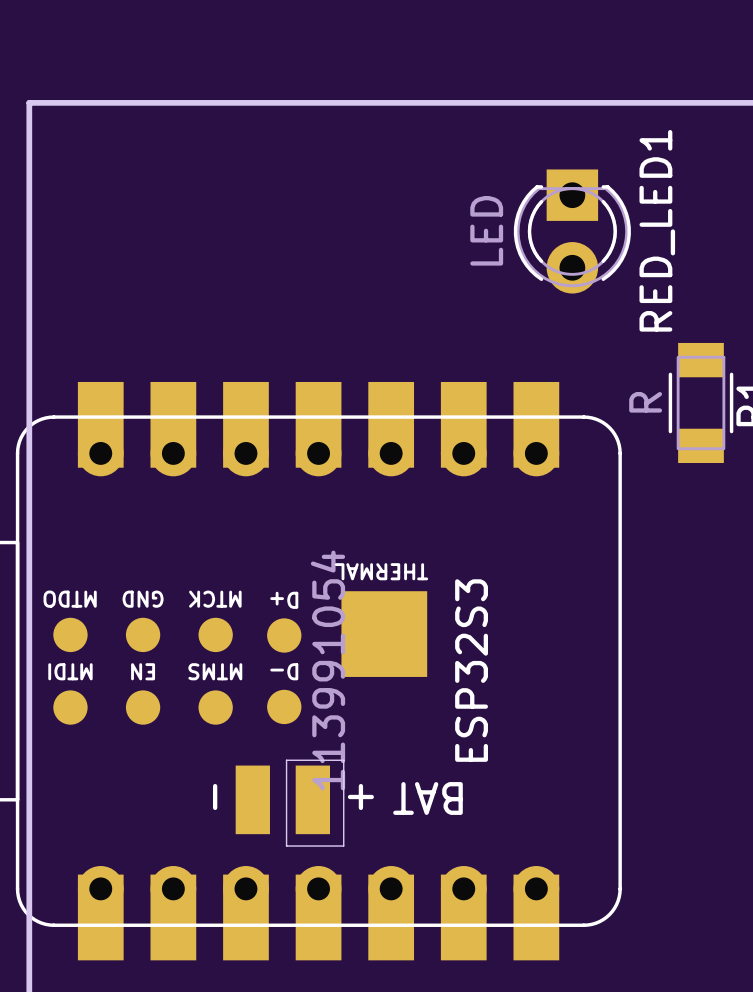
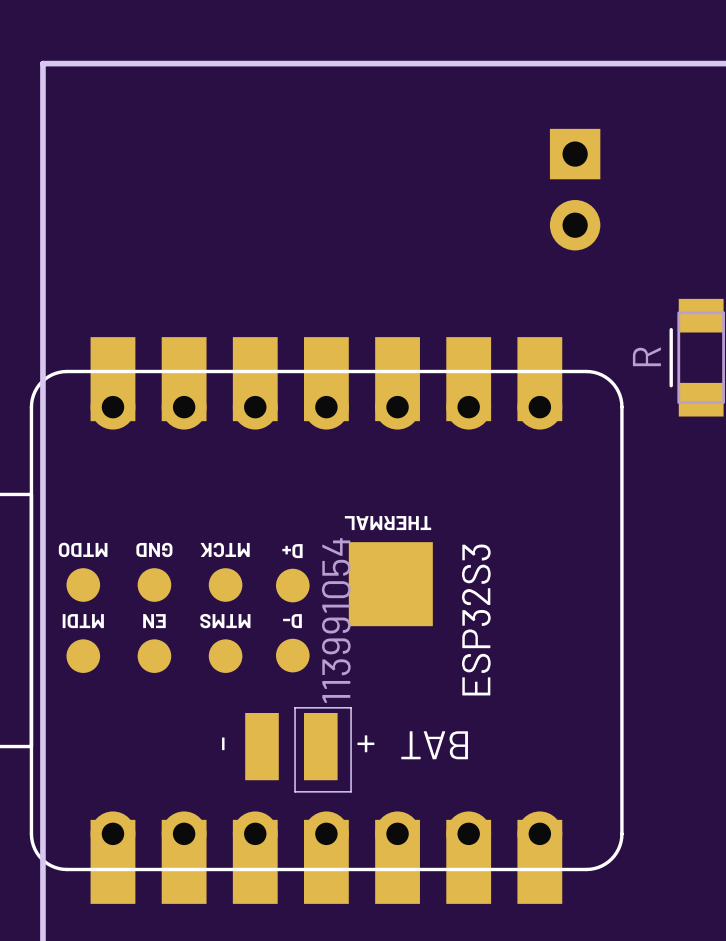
RED_LED1 side: top (572, 231) -> bottom (575, 189)

